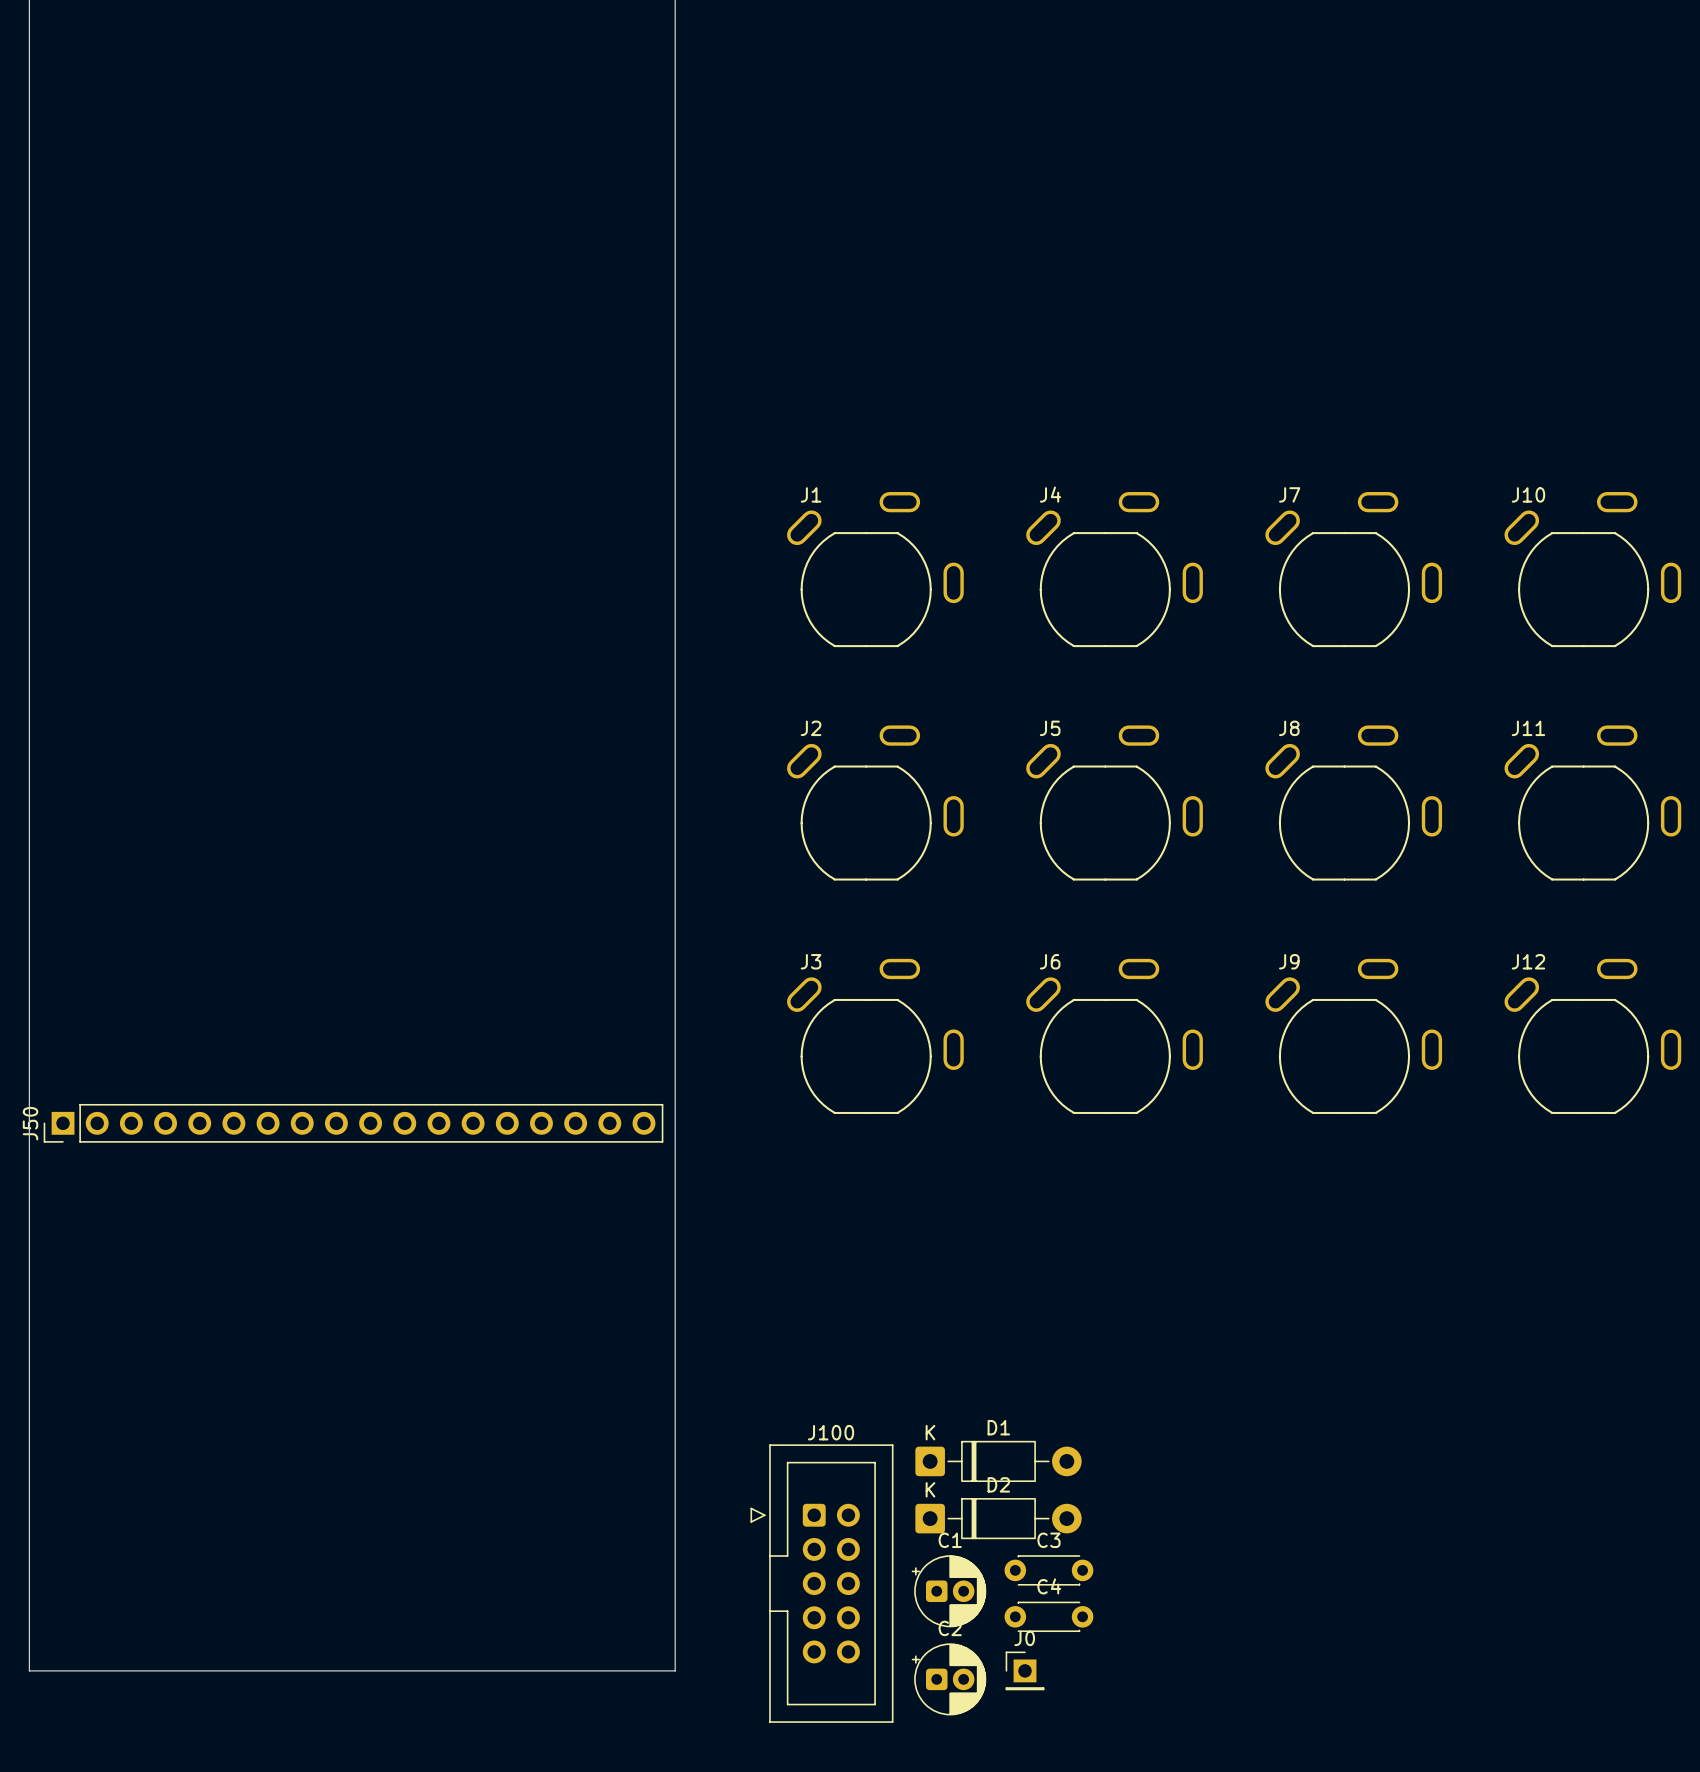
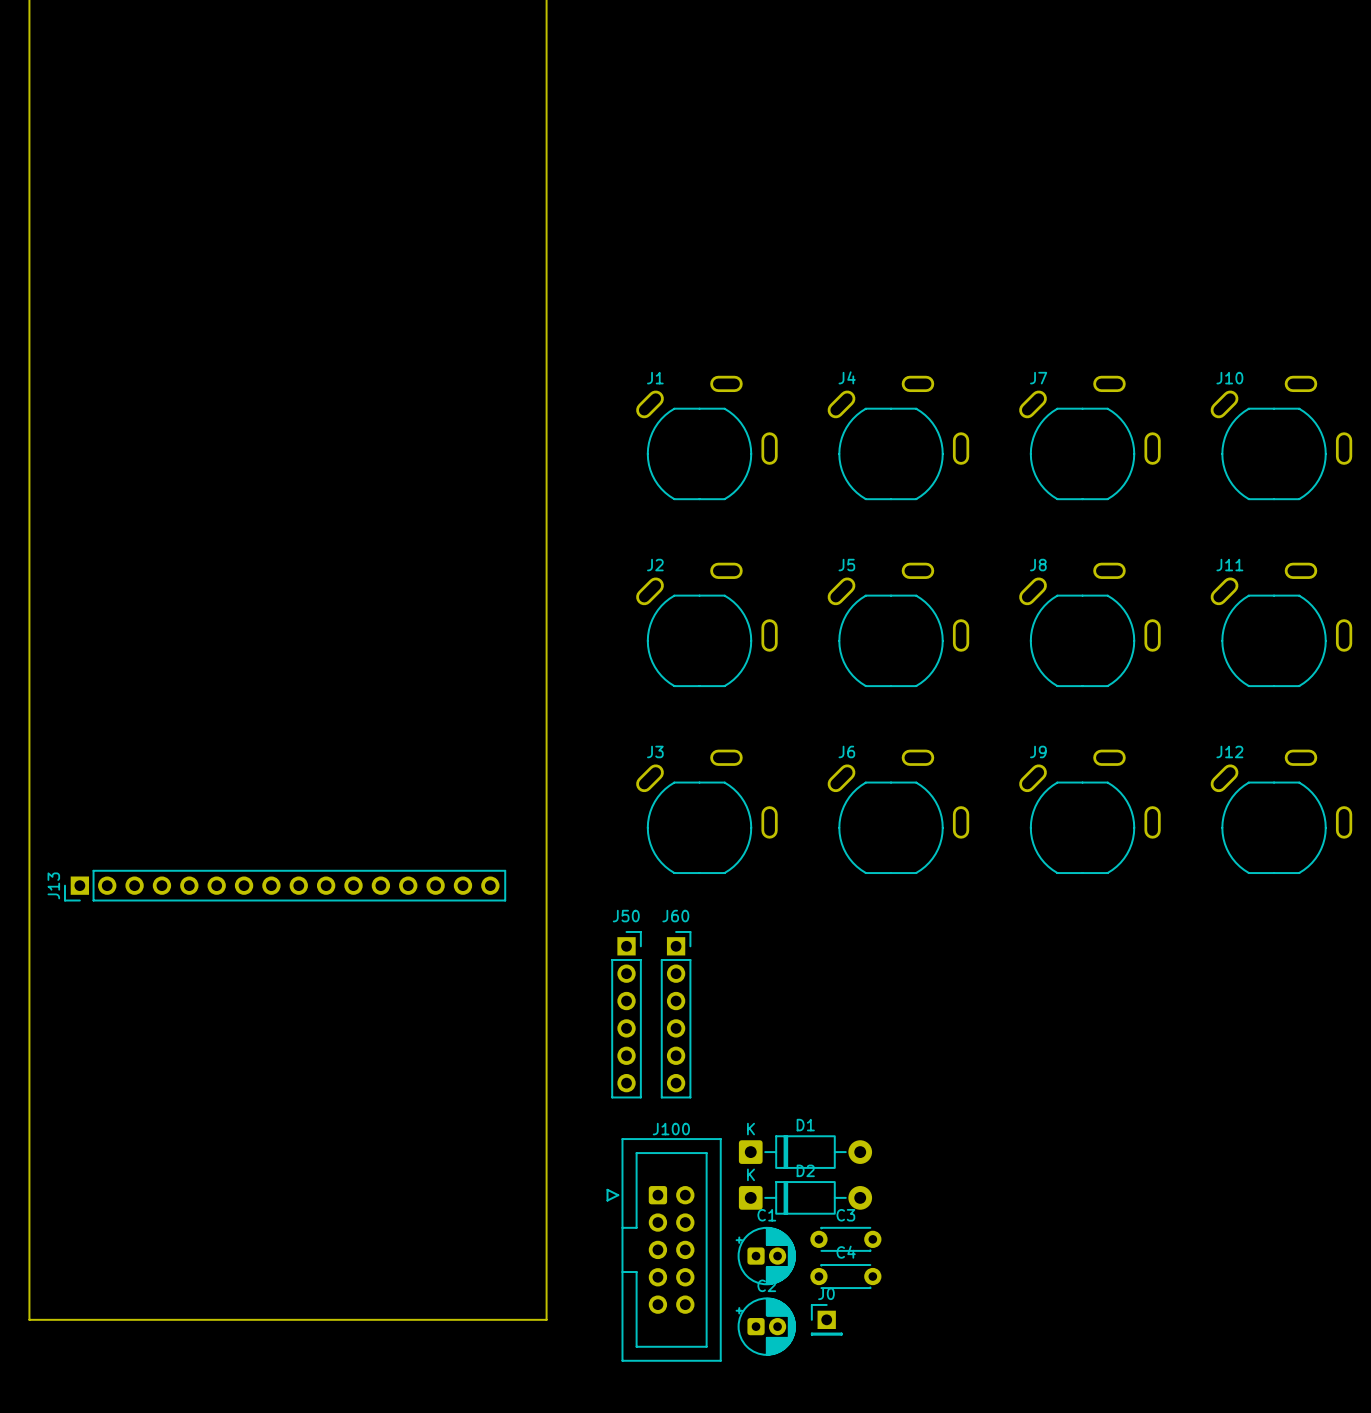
J50 footprint: [43, 1103, 664, 1143] -> [611, 931, 642, 1099]
J50 name position: J50 (30, 1123) -> J50 (626, 916)
J13: none -> (285, 885)
J60: none -> (676, 1014)

